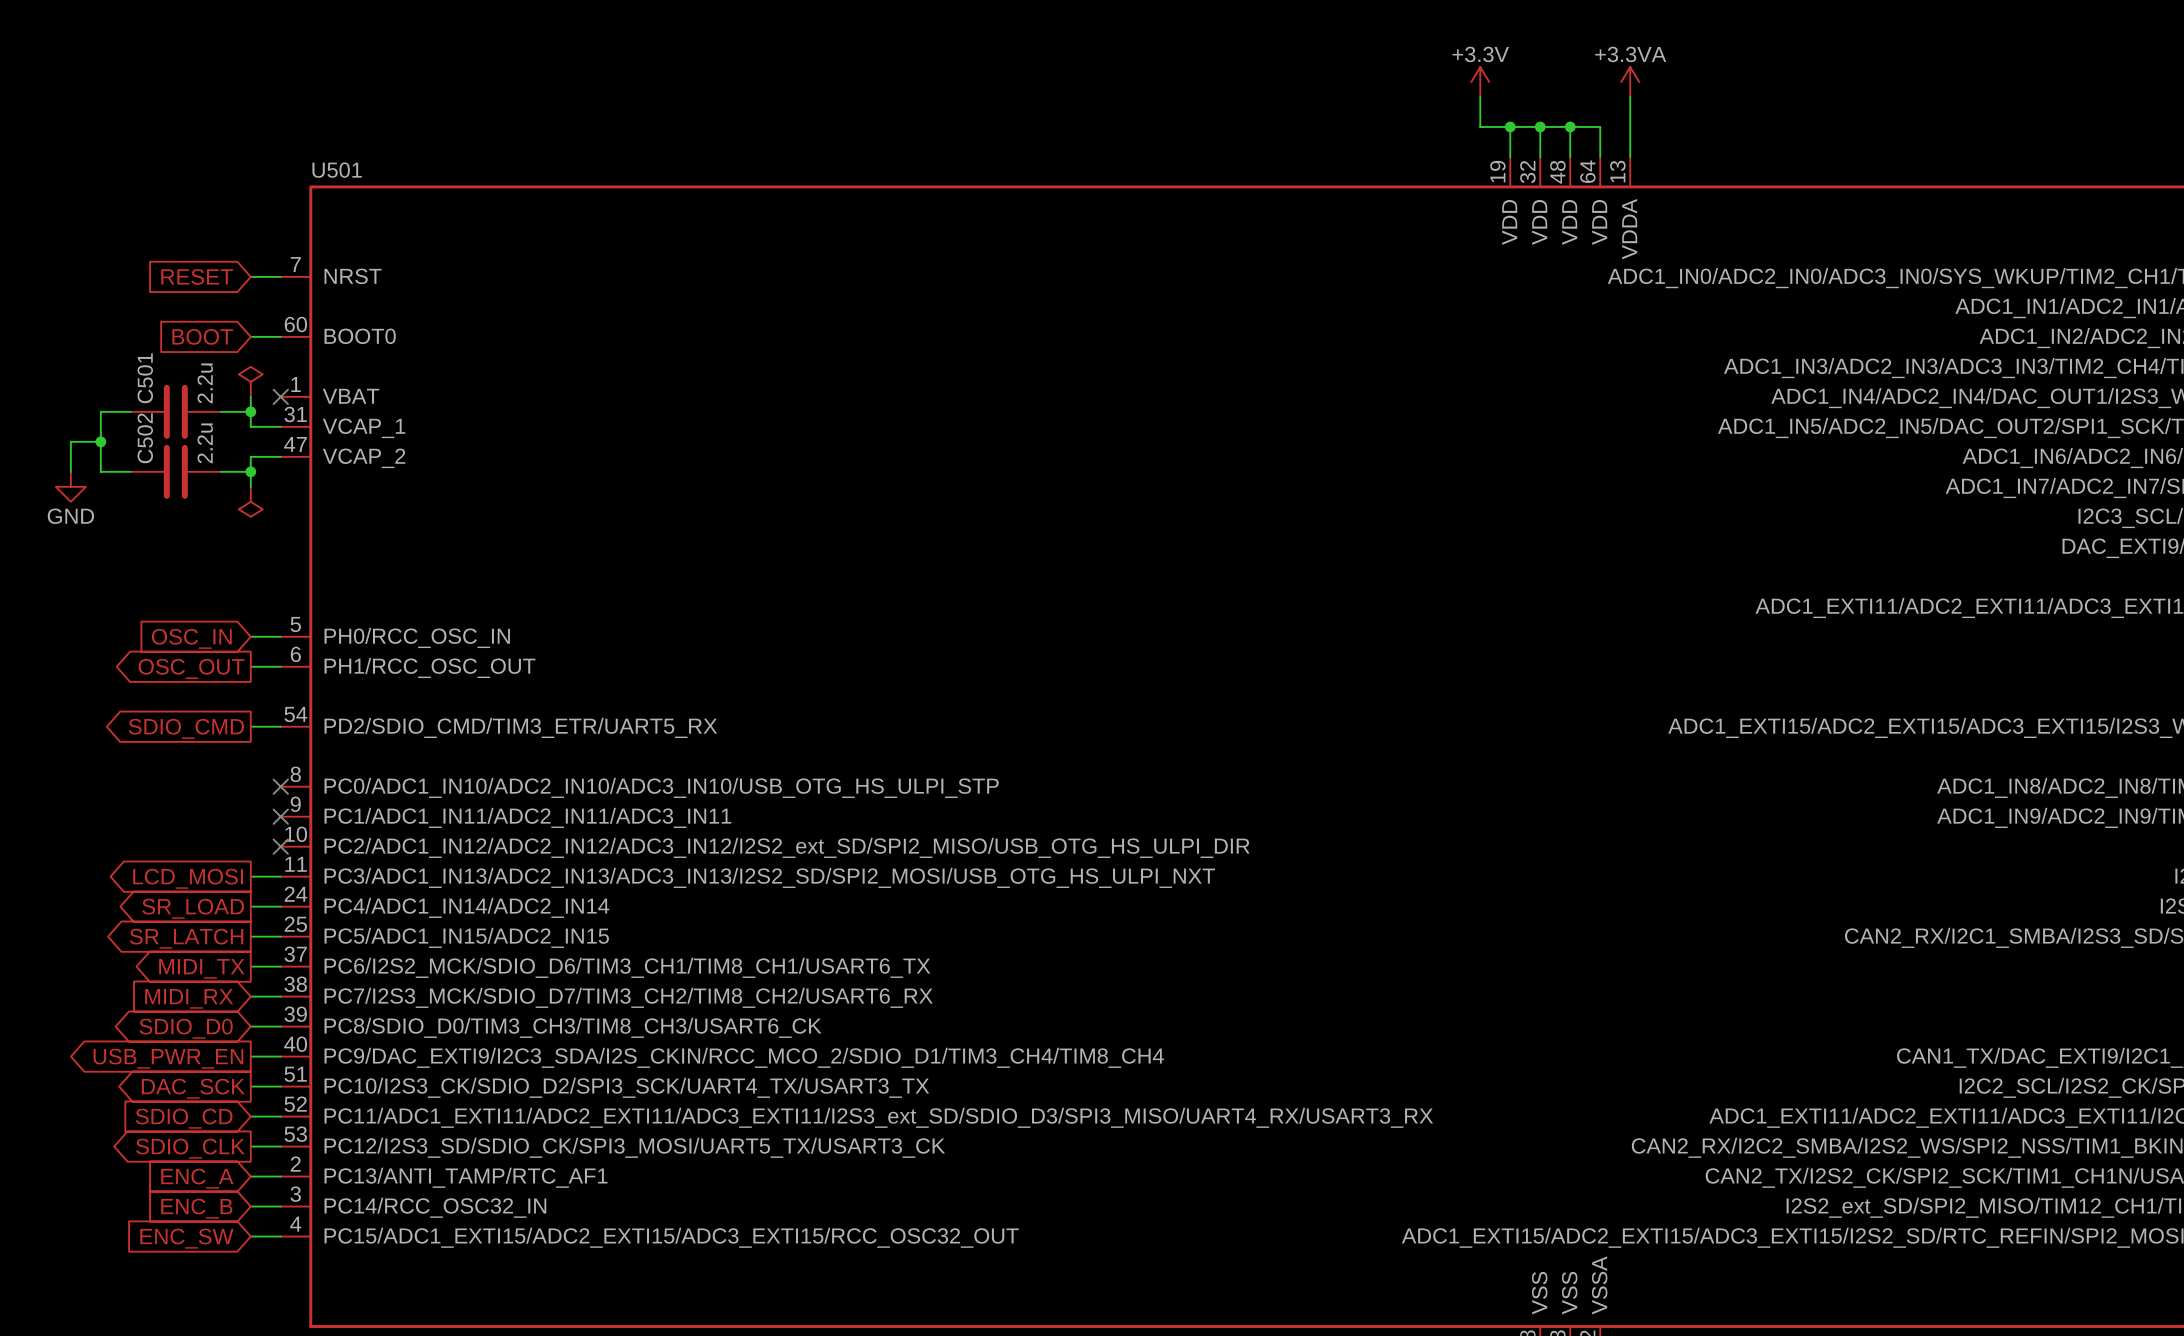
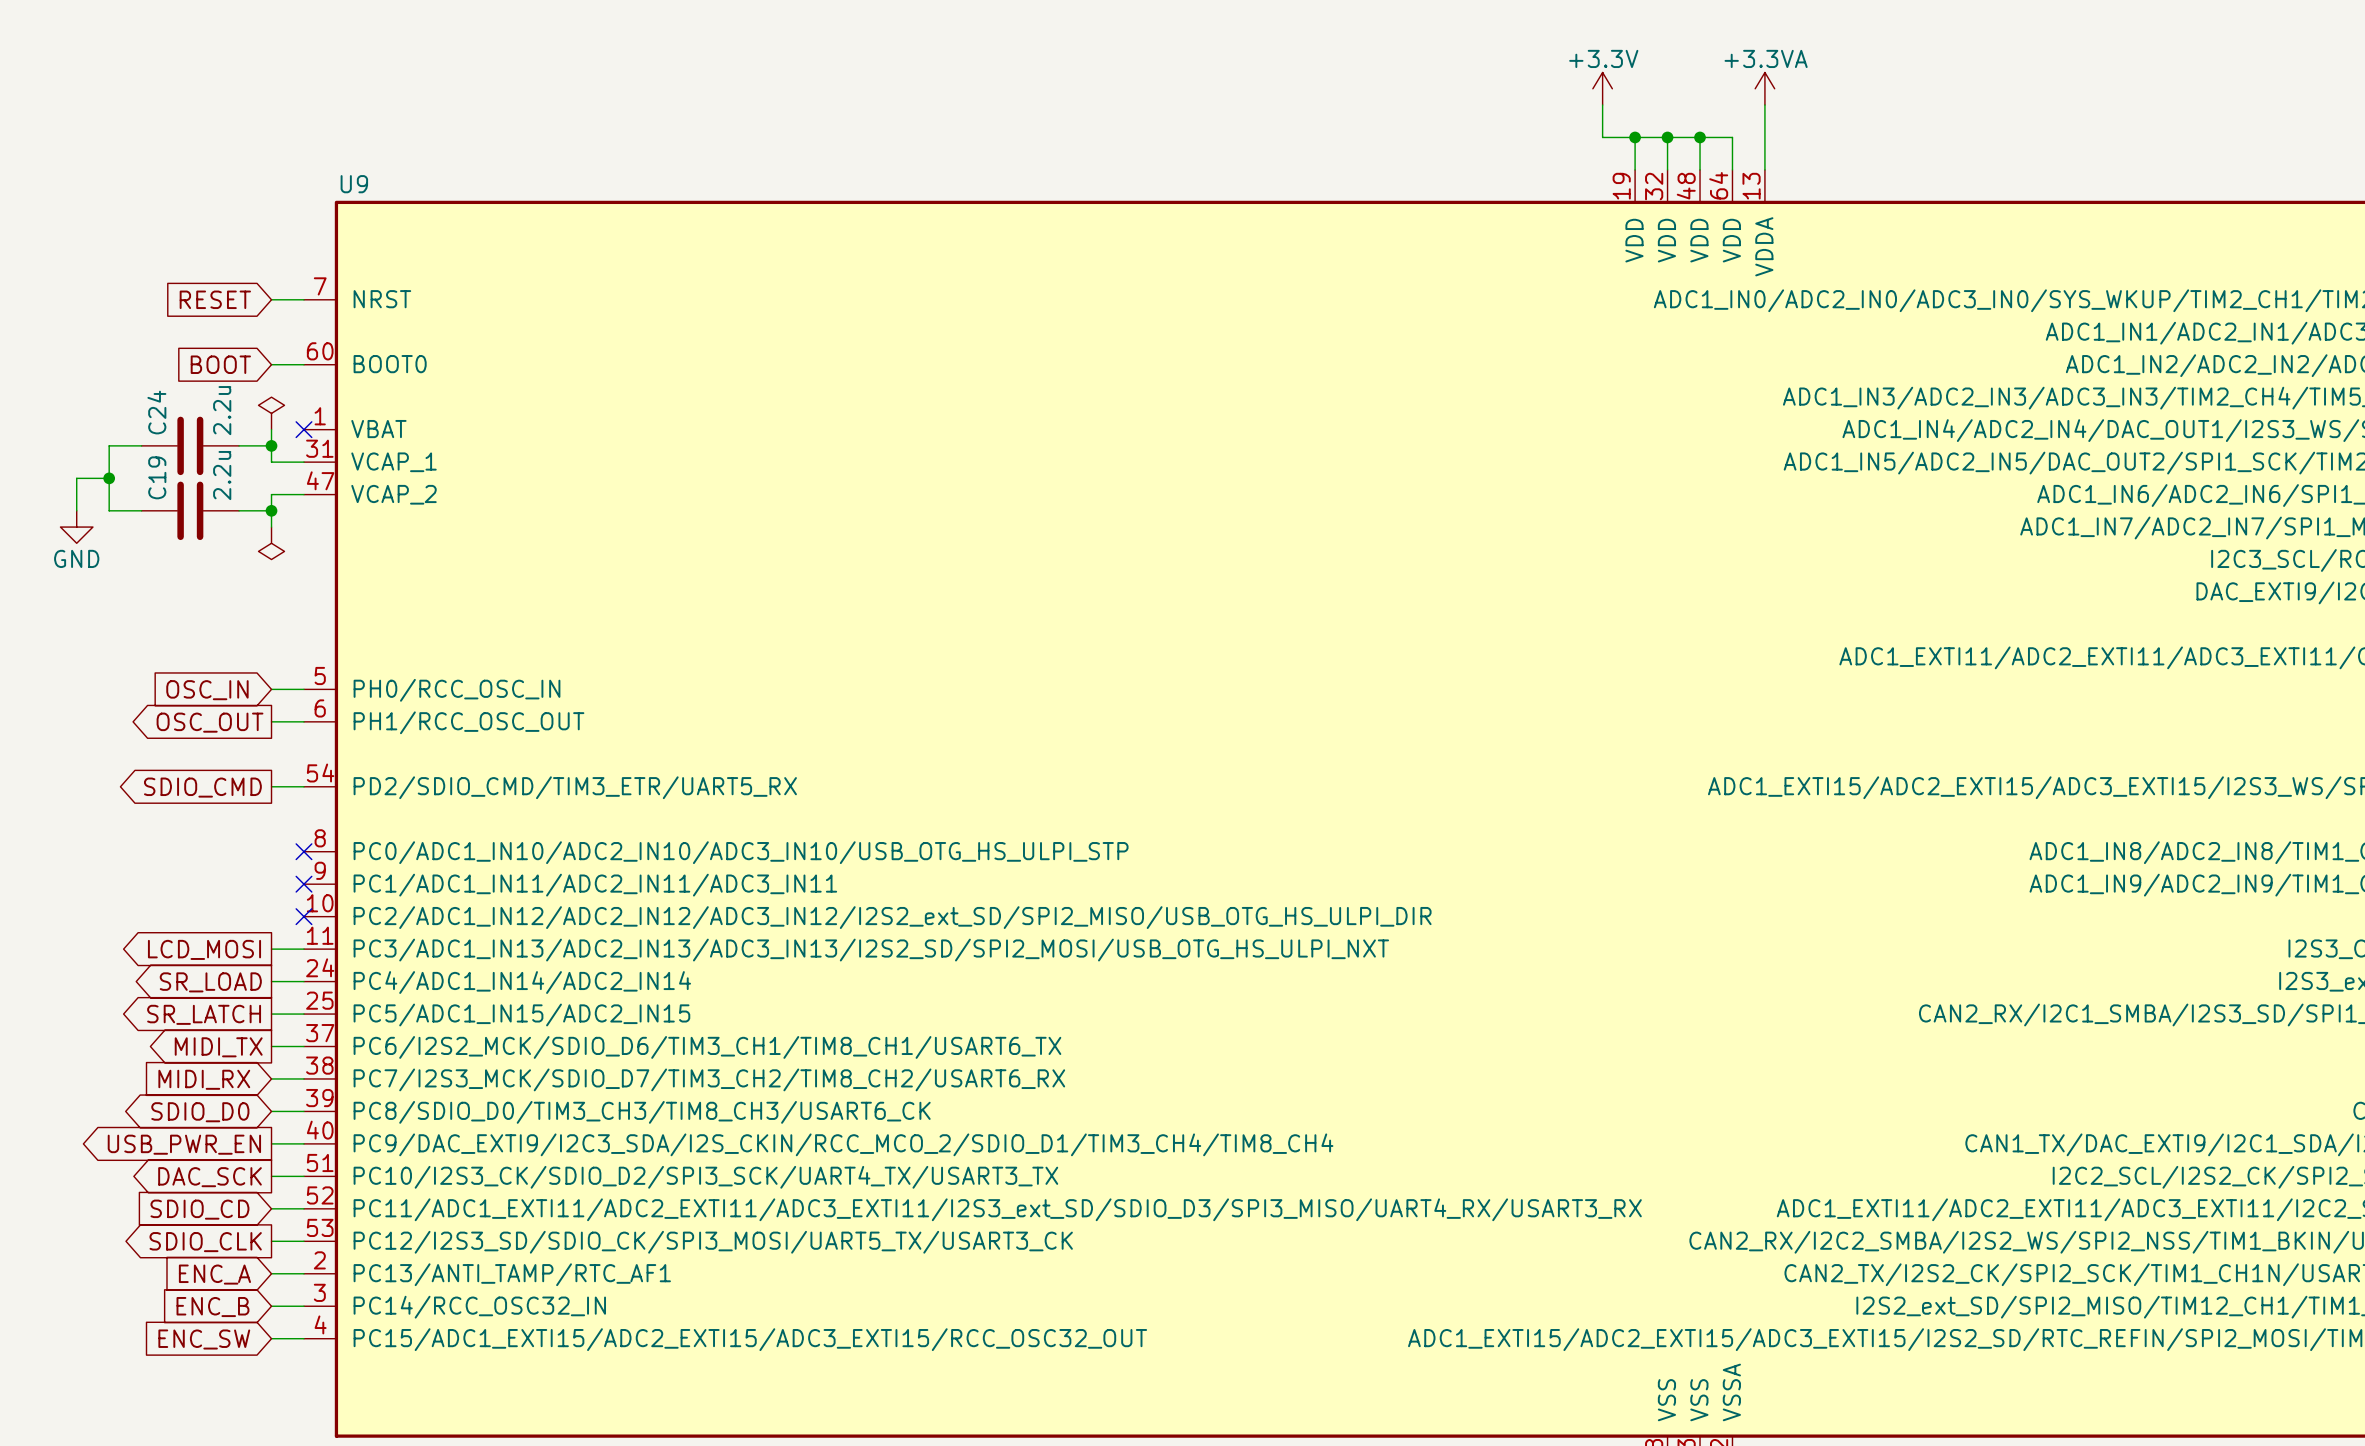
U501 name: U501 (337, 170) -> U9 (354, 184)
C501 name: C501 (145, 378) -> C24 (156, 412)
C502 name: C502 (145, 438) -> C19 (157, 477)

